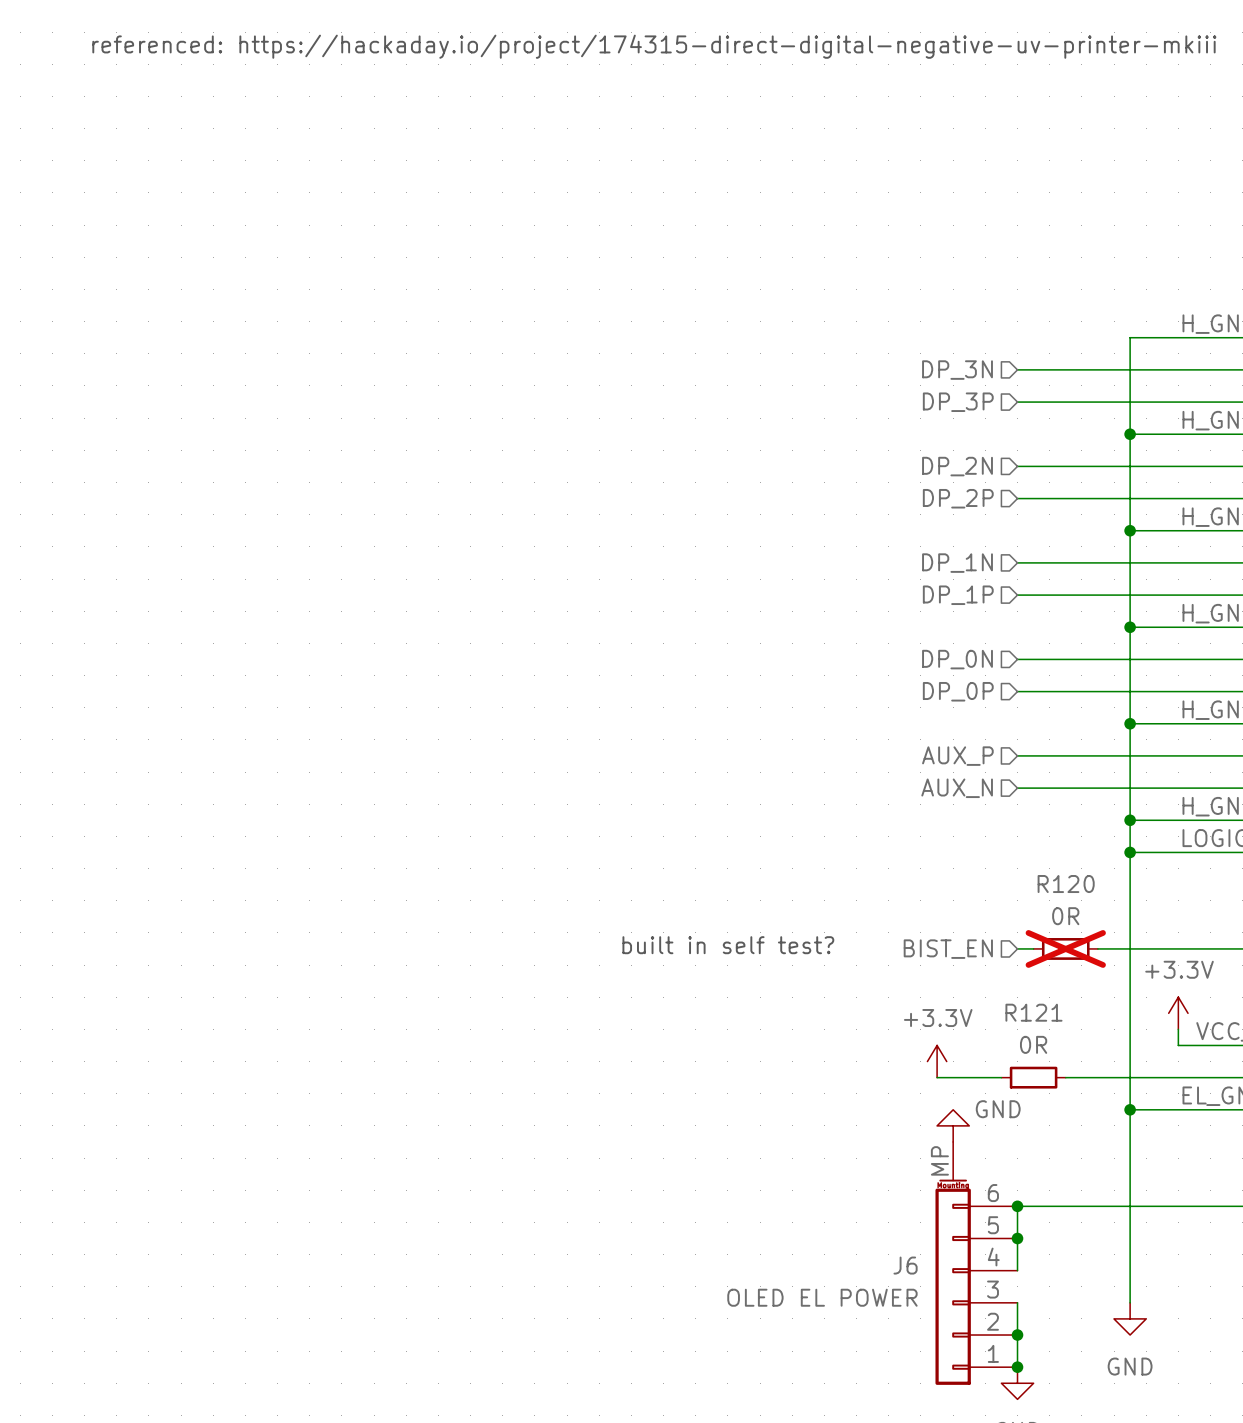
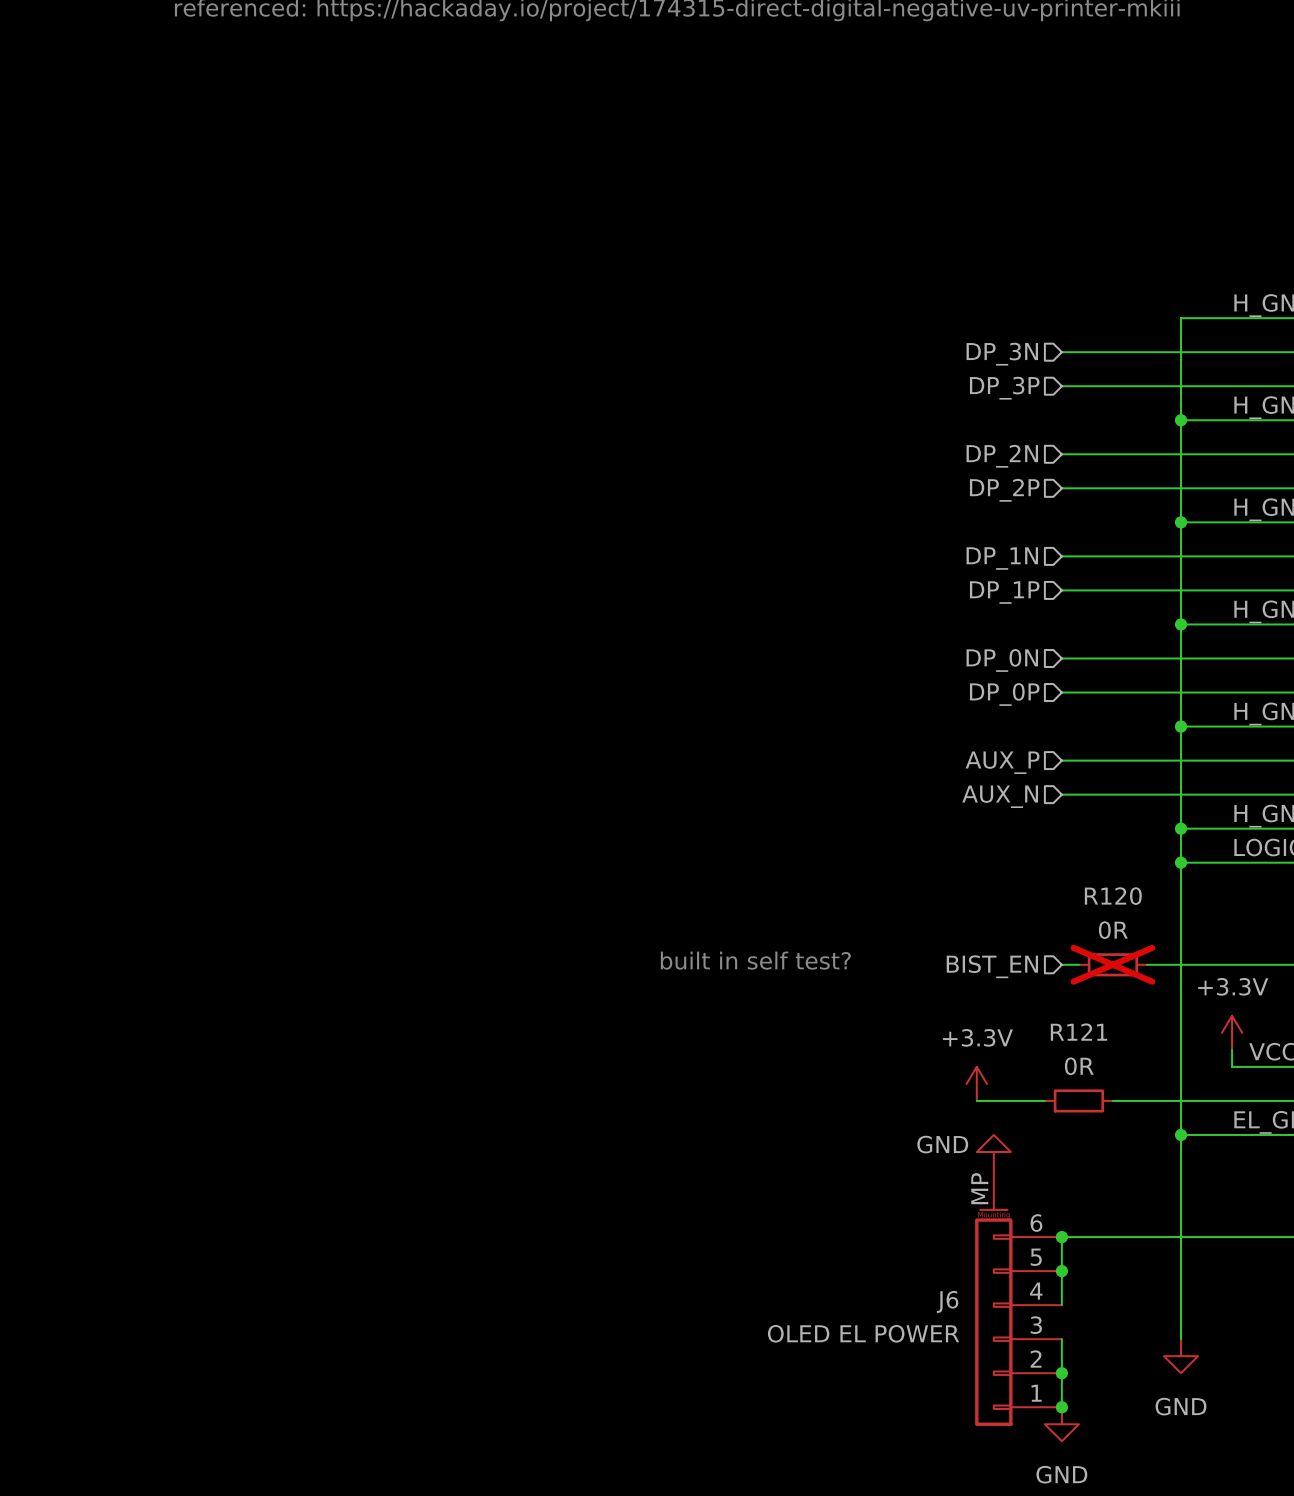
power symbol text position: GND (998, 1109) -> GND (942, 1144)

